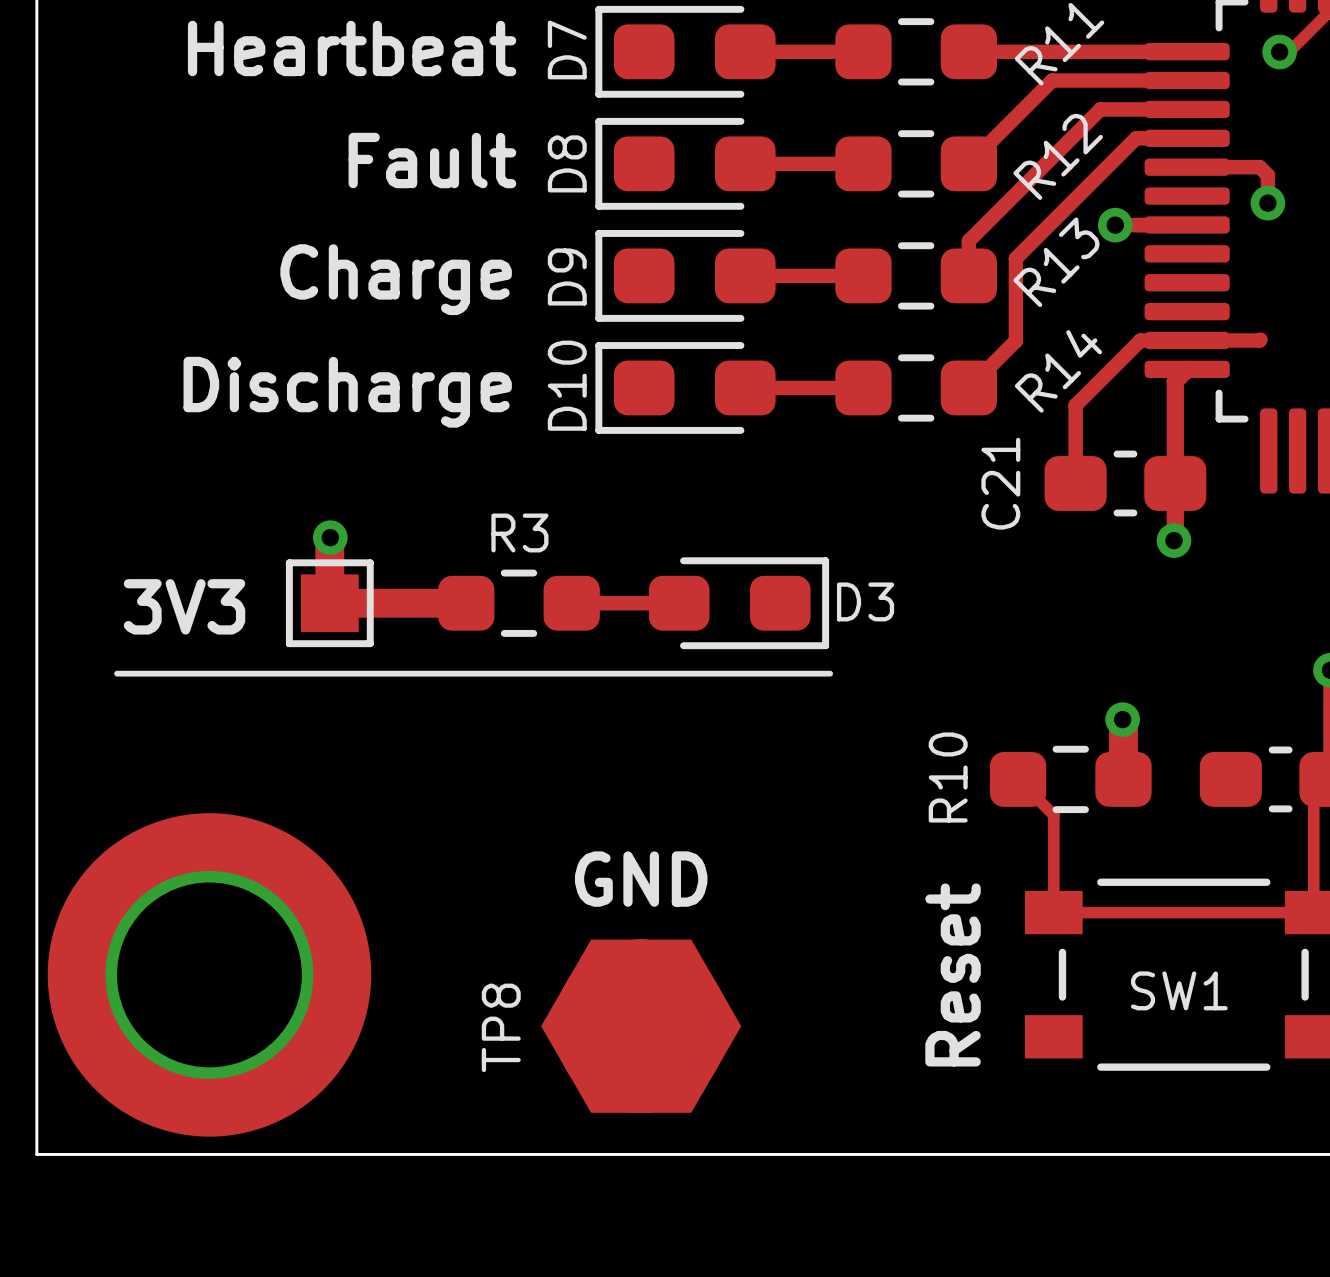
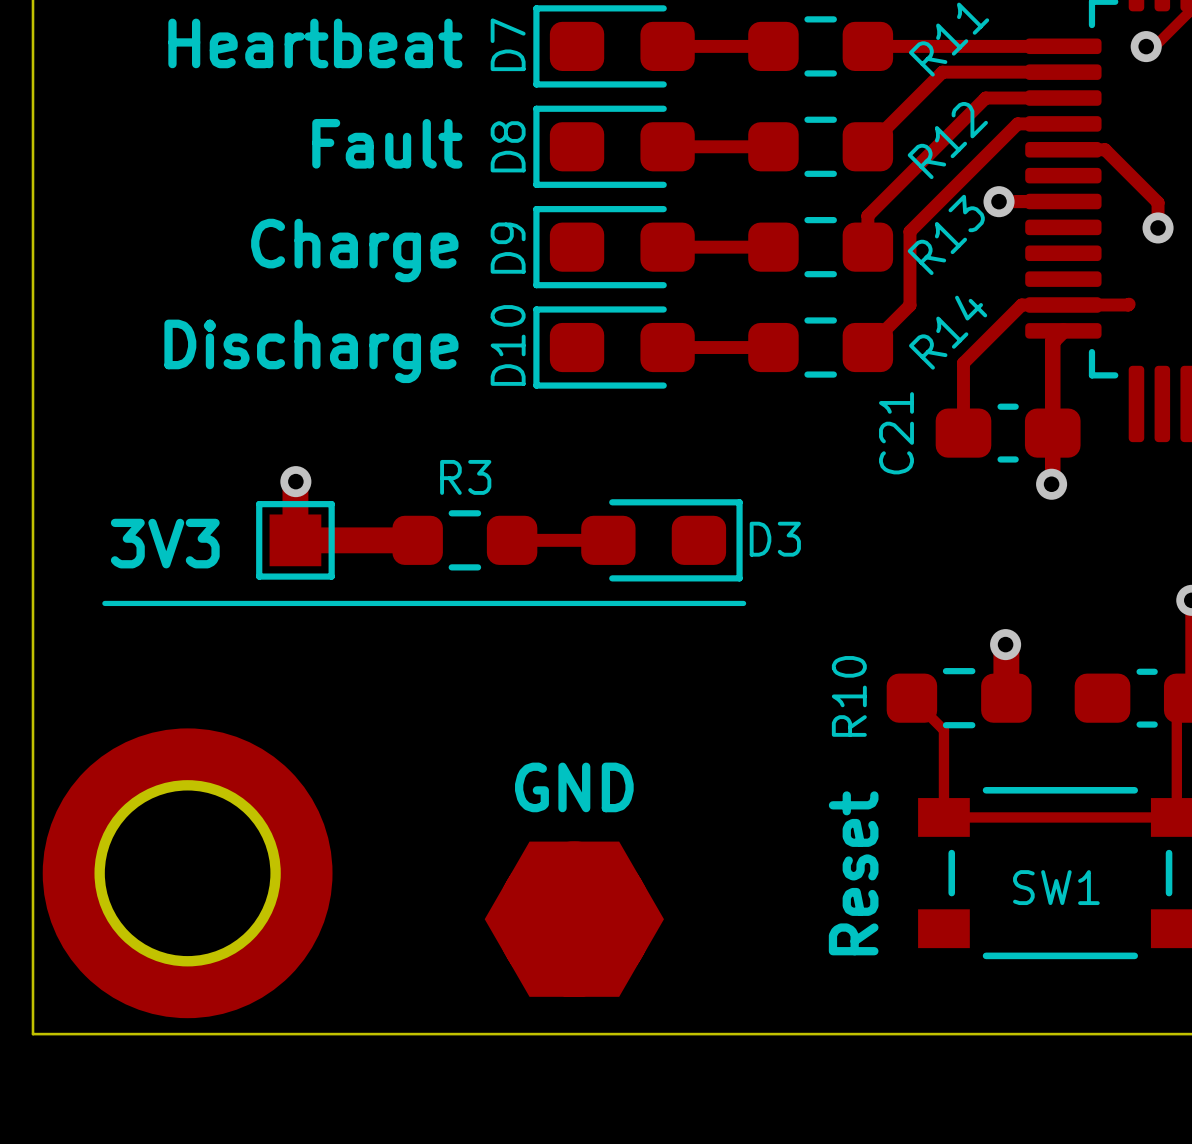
track: (1233, 167) (1259, 167) (1267, 175) (1267, 203) -> (1105, 149) (1158, 202) (1158, 227)
via position: (1267, 203) -> (1158, 227)
TP8 name: TP8 (501, 1027) -> none

